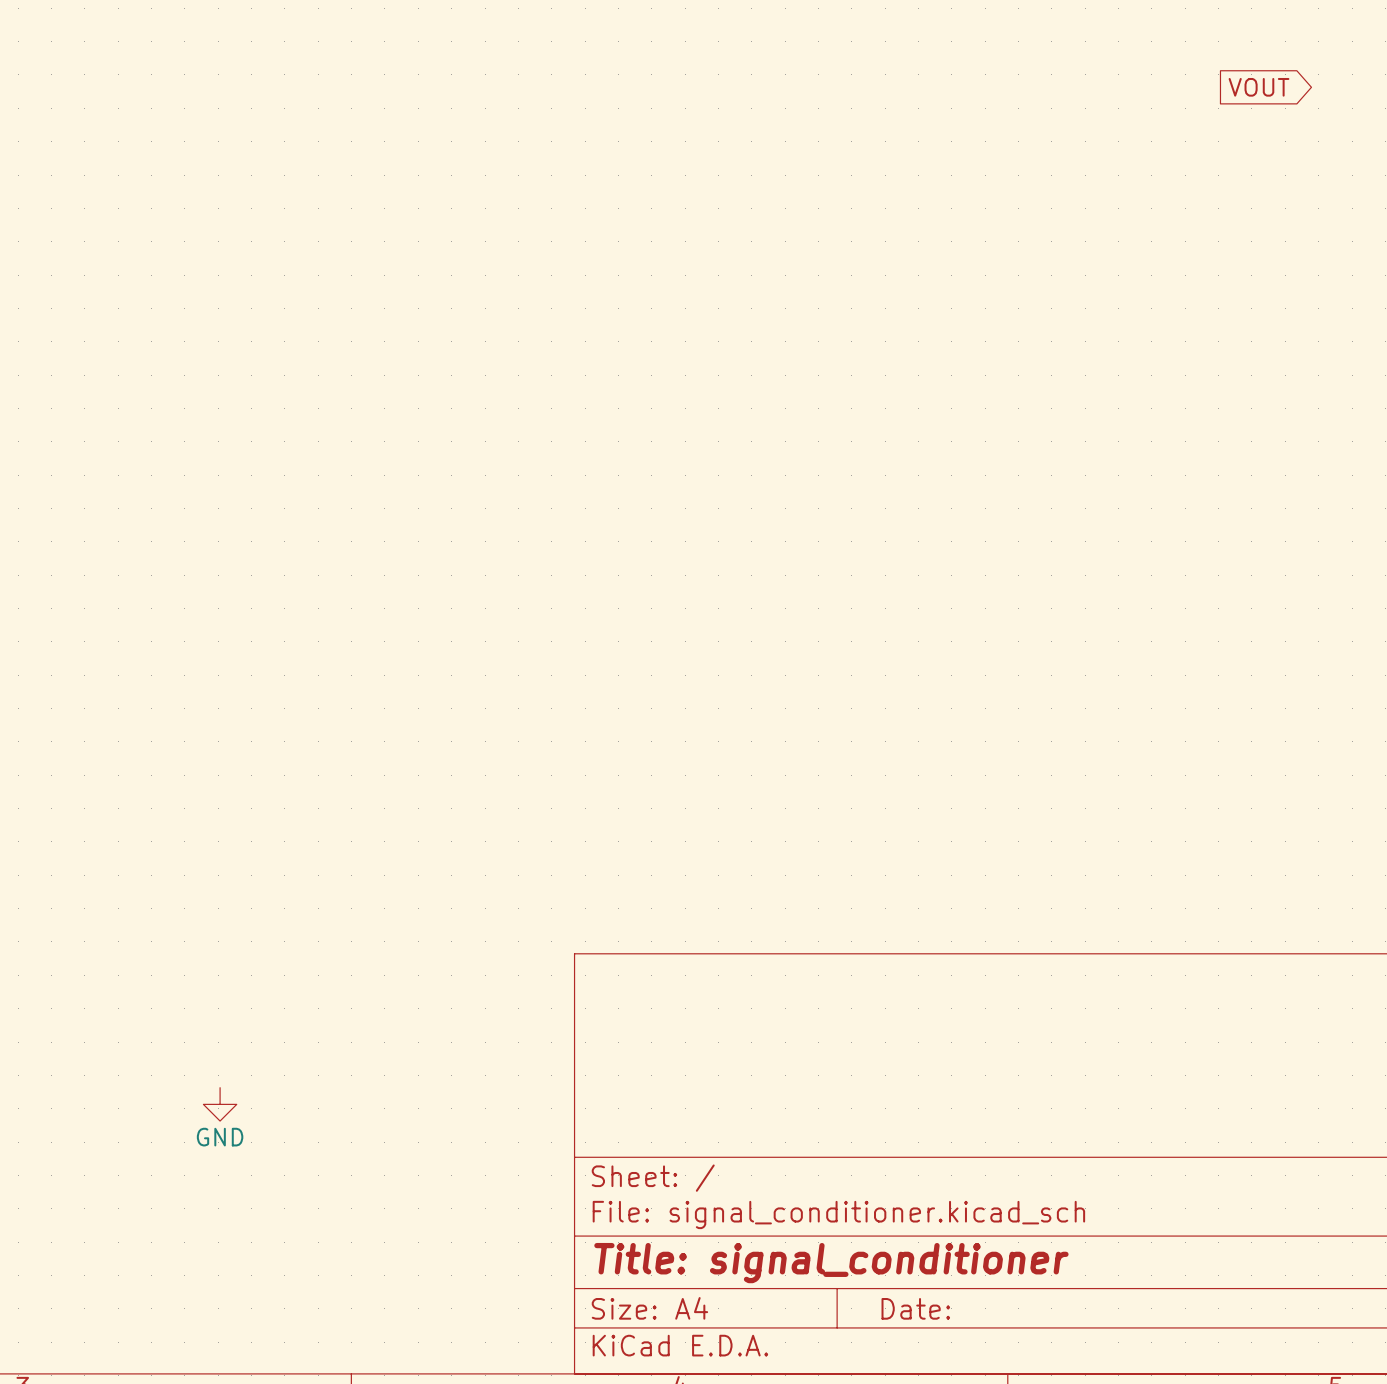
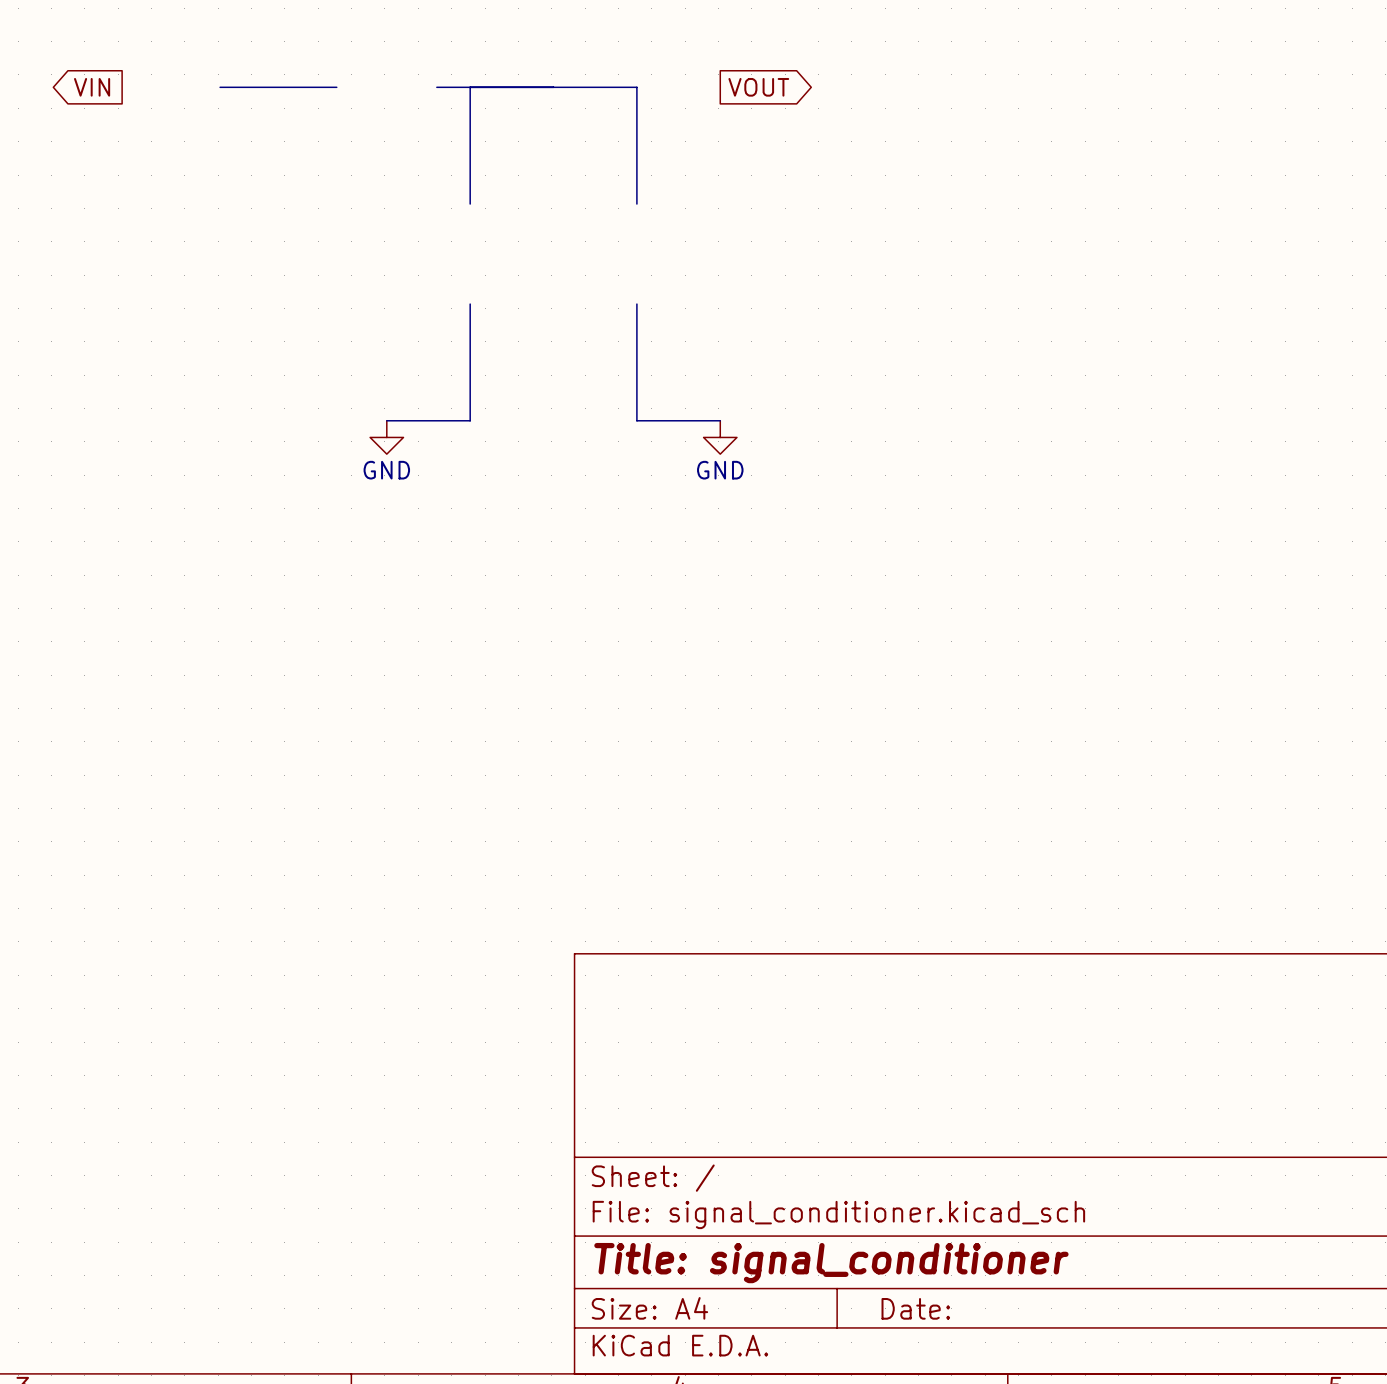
global label: none -> VIN (92, 87)
wire: none -> (220, 87) (336, 87)
wire: none -> (436, 87) (636, 87) (636, 204)
wire: none -> (470, 87) (470, 204)
global label: none -> VOUT (758, 87)
global label: VOUT (1259, 87) -> none
wire: none -> (470, 304) (470, 420) (386, 420)
wire: none -> (636, 304) (636, 420) (720, 420)
power symbol: none -> GND (386, 437)
power symbol: none -> GND (720, 437)
power symbol: GND (220, 1104) -> none

